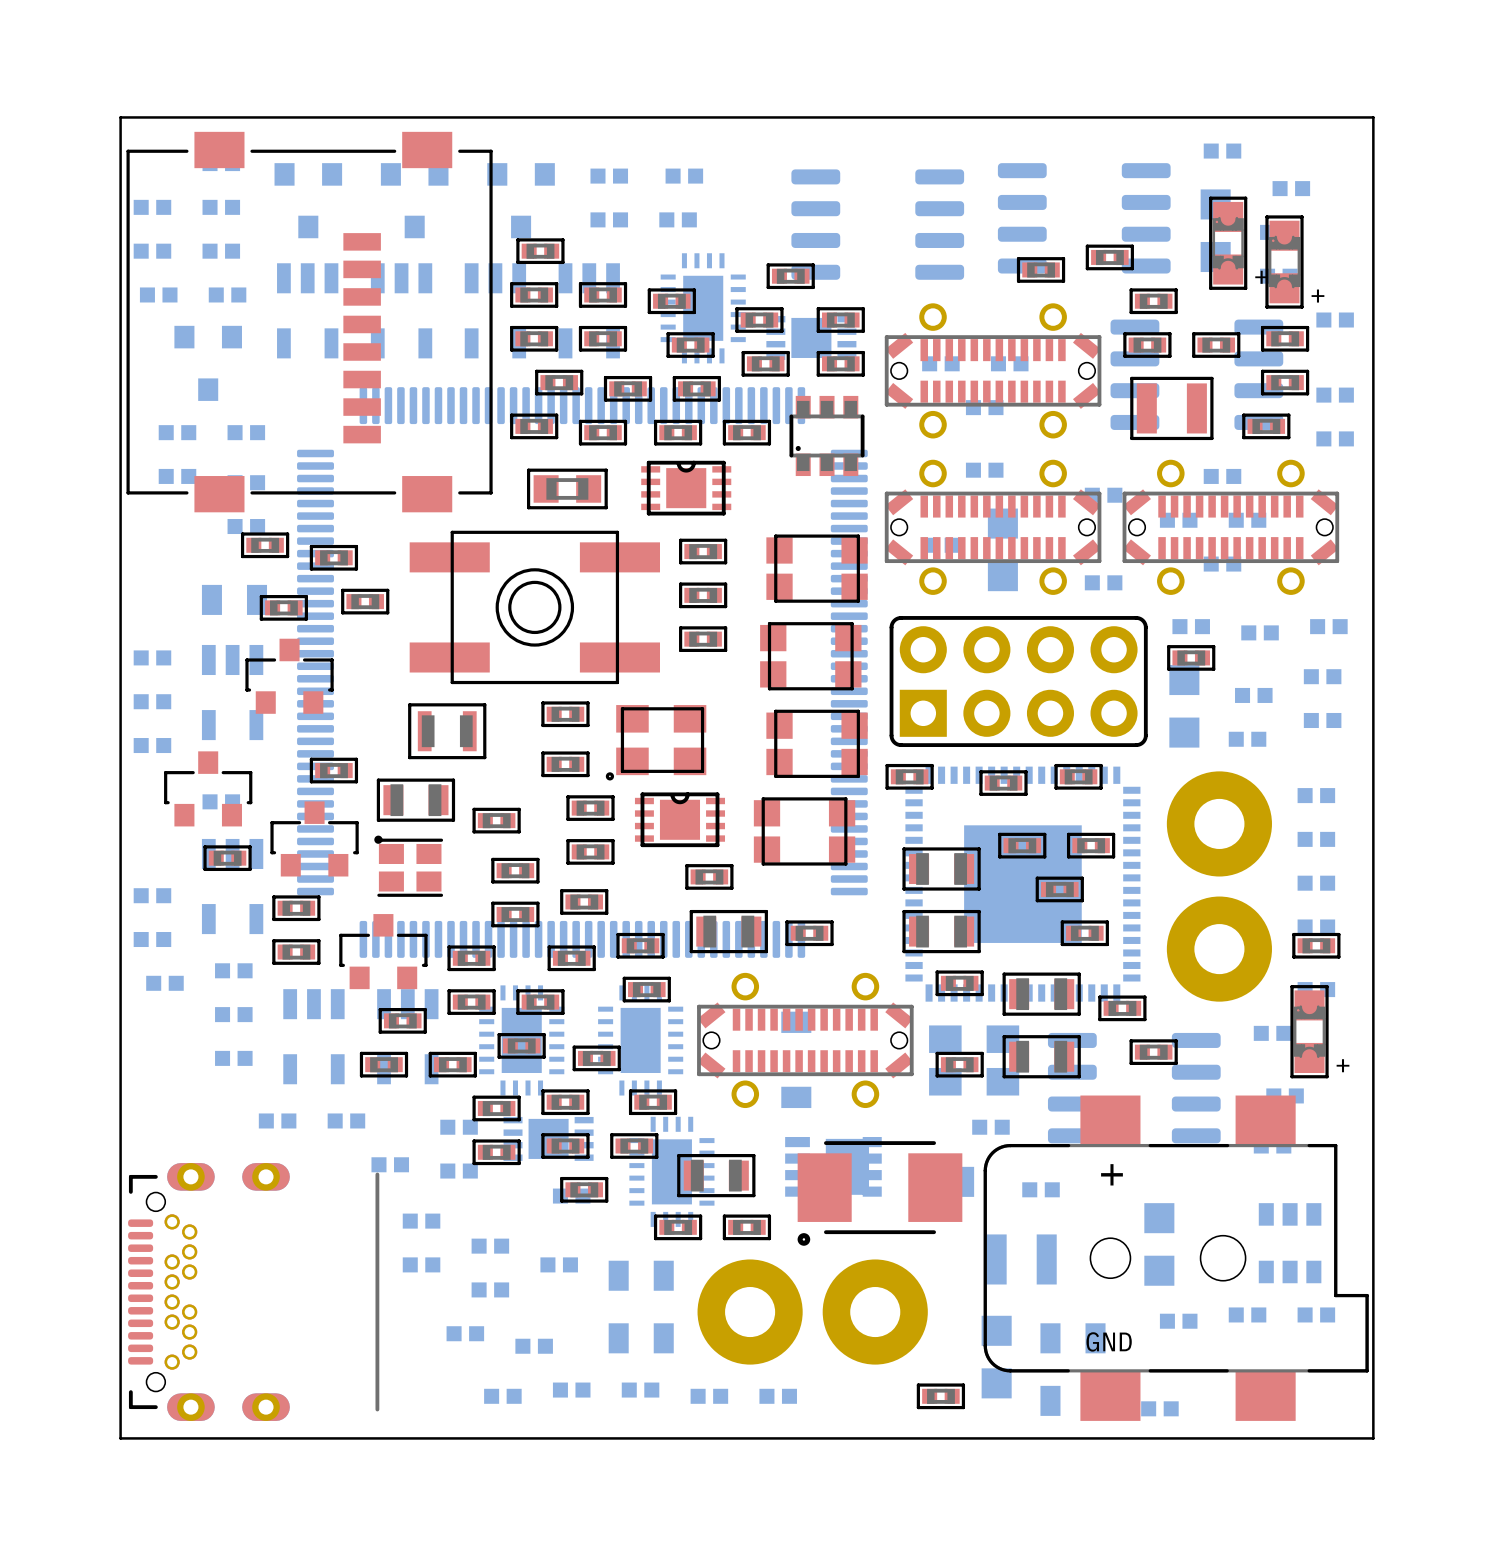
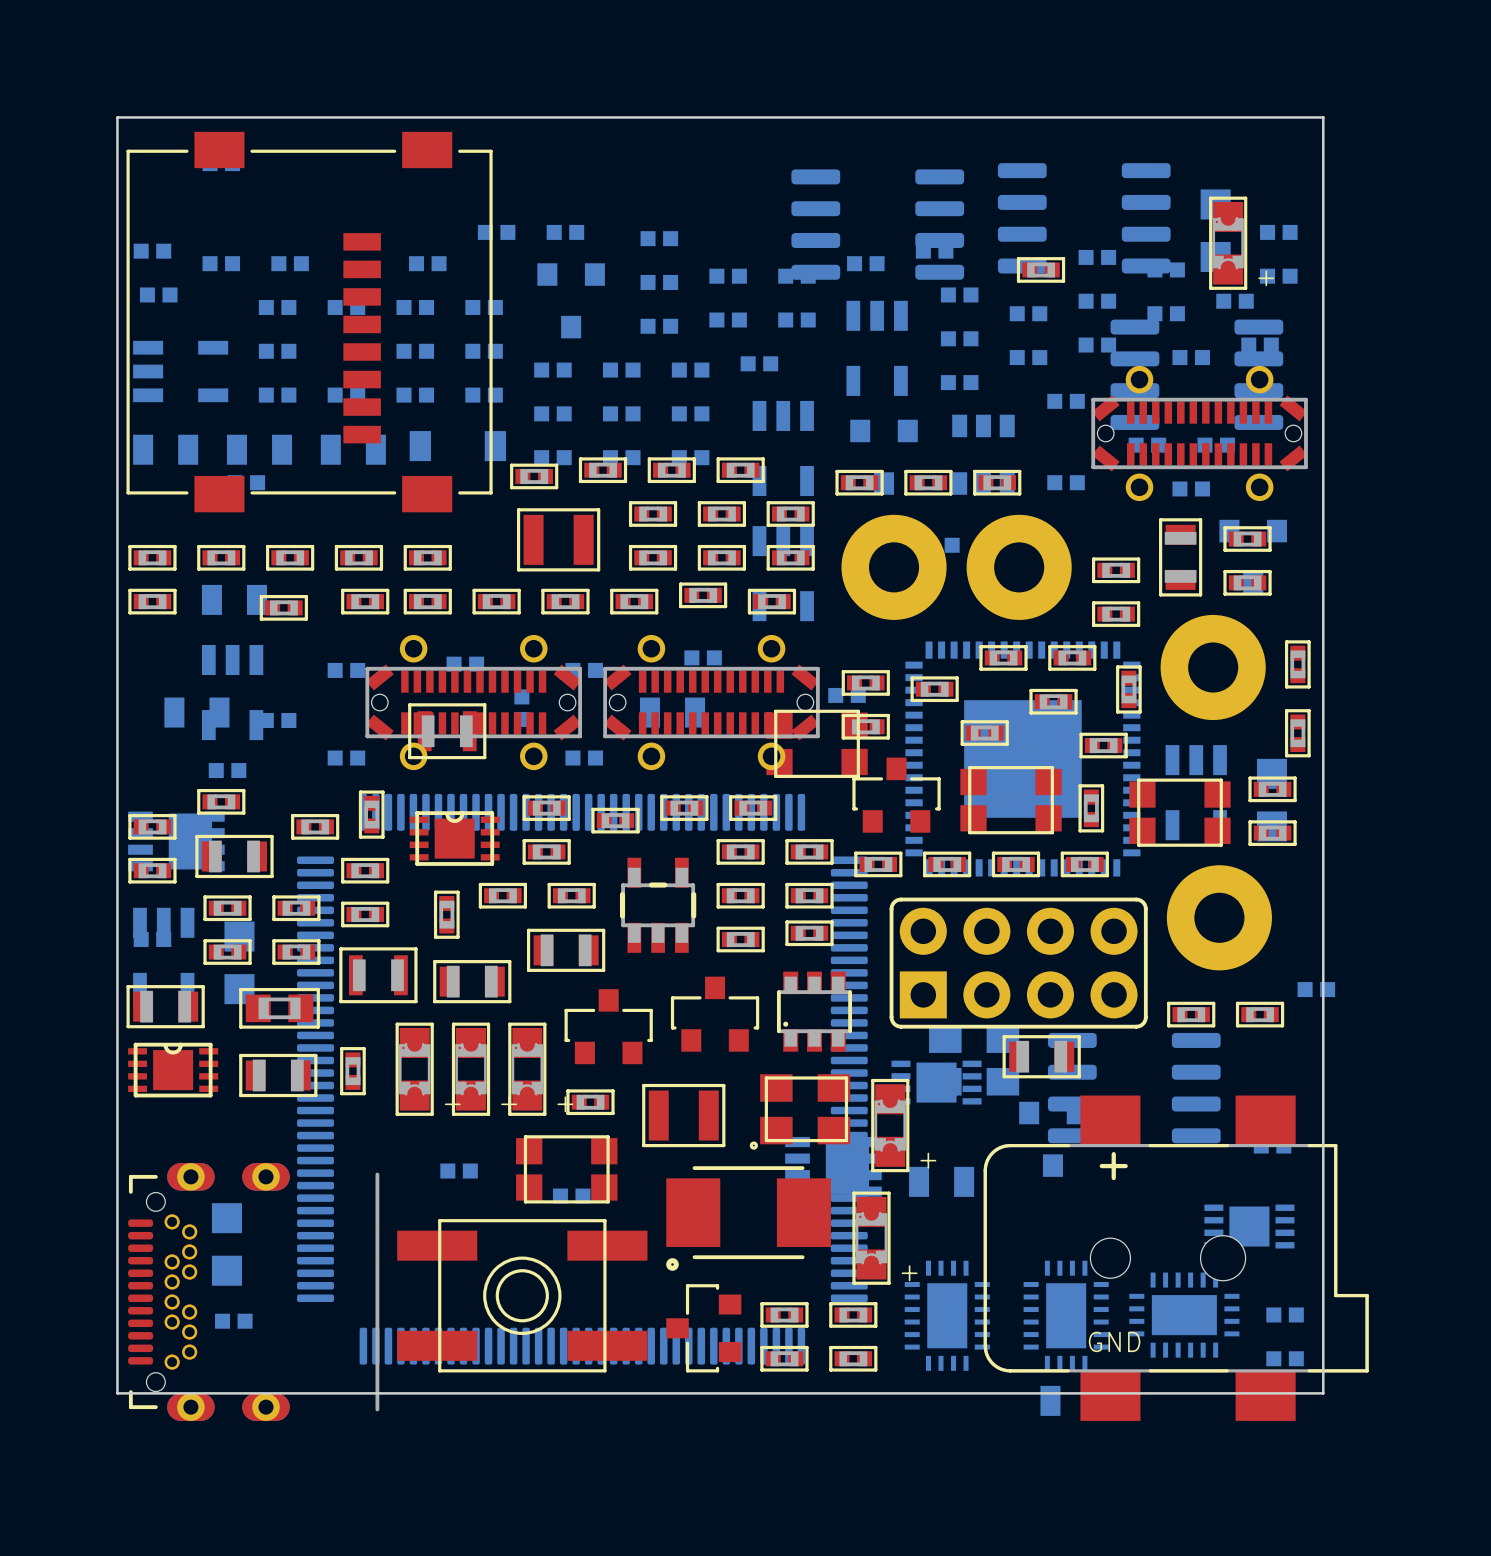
board edge: (120, 117) (120, 1438) (1373, 1438) (1373, 117) (1323, 117) -> (120, 117) (117, 117) (117, 1393) (1323, 1393) (1323, 117)
part: (1222, 151) -> none
part: (609, 176) -> none
part: (684, 176) -> none
part: (1291, 188) -> none
part: (308, 200) -> none
part: (414, 200) -> none
part: (521, 200) -> none
part: (152, 207) -> none
part: (221, 207) -> none
part: (609, 219) -> none
part: (678, 219) -> none
part: none -> (496, 232)
part: none -> (565, 232)
part: none -> (659, 238)
part position: (221, 251) -> (221, 263)
part: (540, 251) -> none
part: none -> (934, 251)
part side: top (1109, 257) -> bottom (1097, 257)
part: (1284, 262) -> none
part: none -> (290, 263)
part footprint: [370, 263, 433, 359] -> [396, 299, 435, 316]
part: none -> (427, 263)
part footprint: [464, 263, 527, 359] -> [465, 299, 503, 316]
part: none -> (865, 263)
part: none -> (1166, 269)
part: none -> (728, 276)
part side: top (790, 276) -> bottom (796, 276)
part: none -> (659, 282)
part: (227, 294) -> none
part: (534, 294) -> none
part: (603, 294) -> none
part: none -> (959, 294)
part: none -> (571, 300)
part: (671, 301) -> none
part: none -> (1097, 301)
part: (1153, 301) -> none
part: none -> (1235, 301)
part: none -> (277, 307)
part: none -> (346, 307)
part: (703, 308) -> none
part rotation: 0° (307, 310) -> 90° counterclockwise (180, 371)
part position: (307, 310) -> (180, 371)
part: (589, 310) -> none
part: none -> (1028, 313)
part: none -> (1166, 313)
part: none -> (728, 320)
part: (759, 320) -> none
part: none -> (796, 320)
part: (840, 320) -> none
part: (1335, 320) -> none
part: none -> (659, 326)
part: (811, 337) -> none
part: (534, 338) -> none
part: (603, 338) -> none
part: none -> (959, 338)
part: (1285, 338) -> none
part: (690, 345) -> none
part: none -> (1097, 345)
part: (1147, 345) -> none
part: (1216, 345) -> none
part: none -> (1260, 345)
part: none -> (877, 348)
part: none -> (277, 351)
part: none -> (415, 351)
part: none -> (484, 351)
part: none -> (1191, 357)
part: (208, 363) -> none
part side: top (765, 363) -> bottom (759, 363)
part: (840, 363) -> none
part: (940, 363) -> none
part position: (1009, 363) -> (1028, 357)
part: none -> (621, 370)
part: none -> (690, 370)
part: (993, 370) -> none
part side: top (559, 382) -> bottom (552, 370)
part: none -> (959, 382)
part: (1285, 382) -> none
part footprint: [297, 387, 868, 958] -> [565, 662, 604, 678]
part: (628, 388) -> none
part: (696, 388) -> none
part: none -> (277, 395)
part: none -> (346, 395)
part: none -> (415, 395)
part: none -> (484, 395)
part: (1335, 395) -> none
part: none -> (1066, 401)
part: (984, 407) -> none
part: (1171, 408) -> none
part: none -> (552, 413)
part: none -> (621, 413)
part: none -> (690, 413)
part footprint: [227, 425, 266, 441] -> [226, 434, 293, 465]
part: (534, 426) -> none
part: (1266, 426) -> none
part: (177, 432) -> none
part position: (603, 432) -> (603, 470)
part: (678, 432) -> none
part: (746, 432) -> none
part position: (827, 435) -> (814, 1011)
part: (1335, 438) -> none
part: none -> (1147, 445)
part: none -> (1216, 445)
part: none -> (457, 446)
part: none -> (783, 448)
part: none -> (165, 449)
part: none -> (353, 449)
part: none -> (983, 454)
part: none -> (552, 457)
part: none -> (621, 457)
part: none -> (690, 457)
part: none -> (884, 457)
part: none -> (671, 470)
part: none -> (740, 470)
part: (984, 470) -> none
part: (177, 476) -> none
part: none -> (534, 476)
part: (1222, 476) -> none
part: none -> (859, 482)
part: none -> (928, 482)
part: none -> (997, 482)
part: none -> (1066, 482)
part position: (567, 488) -> (279, 1008)
part: (686, 488) -> none
part: none -> (1191, 488)
part: (1103, 495) -> none
part: none -> (653, 513)
part: none -> (721, 513)
part: none -> (790, 513)
part: (1178, 520) -> none
part: (1247, 520) -> none
part: (246, 526) -> none
part: (993, 527) -> none
part position: (1230, 527) -> (1199, 433)
part: none -> (558, 539)
part: none -> (1247, 539)
part: (265, 545) -> none
part: (1002, 549) -> none
part position: (703, 551) -> (721, 557)
part: none -> (152, 557)
part: none -> (221, 557)
part: none -> (290, 557)
part: (333, 557) -> none
part: none -> (358, 557)
part: none -> (427, 557)
part: none -> (653, 557)
part: none -> (790, 557)
part: none -> (1180, 557)
part: none -> (1253, 557)
part: (1222, 564) -> none
part: none -> (894, 567)
part: none -> (1019, 567)
part: (817, 568) -> none
part: none -> (1116, 570)
part: none -> (783, 573)
part: (1103, 582) -> none
part: none -> (1247, 582)
part: none -> (152, 601)
part: none -> (427, 601)
part: none -> (496, 601)
part: none -> (565, 601)
part: none -> (634, 601)
part: none -> (771, 601)
part: (534, 607) -> none
part: none -> (1116, 614)
part: (1191, 626) -> none
part: (1328, 626) -> none
part: (1260, 632) -> none
part side: top (703, 639) -> bottom (703, 657)
part: (810, 656) -> none
part: (152, 657) -> none
part: none -> (1003, 657)
part: none -> (1072, 657)
part: (1191, 657) -> none
part: none -> (465, 664)
part: none -> (1297, 664)
part: none -> (1213, 667)
part: none -> (346, 670)
part: (289, 676) -> none
part: (1322, 676) -> none
part position: (1018, 681) -> (1018, 963)
part: none -> (865, 682)
part: none -> (934, 689)
part: none -> (1128, 689)
part: none -> (847, 695)
part: (1253, 695) -> none
part: (152, 701) -> none
part: none -> (1053, 701)
part: none -> (473, 702)
part: none -> (711, 702)
part position: (1184, 706) -> (1271, 800)
part: none -> (521, 708)
part: none -> (196, 712)
part: none -> (672, 712)
part: (565, 714) -> none
part: none -> (277, 720)
part: (1322, 720) -> none
part: none -> (865, 726)
part: none -> (984, 733)
part: none -> (1297, 733)
part: (1247, 739) -> none
part position: (656, 742) -> (799, 1111)
part: (152, 745) -> none
part: none -> (1103, 745)
part footprint: [885, 763, 934, 790] -> [852, 757, 941, 833]
part side: top (565, 764) -> bottom (584, 758)
part: none -> (227, 770)
part side: top (333, 770) -> bottom (346, 758)
part: (1078, 776) -> none
part: (1003, 783) -> none
part: (208, 788) -> none
part: none -> (1272, 789)
part footprint: [634, 792, 726, 848] -> [660, 795, 709, 821]
part: none -> (1196, 792)
part: (1316, 795) -> none
part footprint: [753, 797, 856, 866] -> [785, 839, 834, 865]
part: (415, 800) -> none
part: none -> (1011, 800)
part side: bottom (221, 801) -> top (221, 801)
part footprint: [270, 801, 359, 877] -> [291, 814, 340, 840]
part: none -> (546, 808)
part: (590, 808) -> none
part: none -> (753, 808)
part: none -> (1091, 808)
part: none -> (1179, 812)
part: none -> (371, 814)
part: (496, 820) -> none
part: none -> (615, 820)
part: (1219, 823) -> none
part: none -> (152, 826)
part: none -> (1272, 833)
part: none -> (454, 838)
part: (1316, 839) -> none
part: none -> (176, 841)
part footprint: [203, 845, 252, 872] -> [195, 834, 274, 879]
part position: (1022, 845) -> (1016, 864)
part: (1091, 845) -> none
part footprint: [902, 847, 981, 891] -> [923, 851, 972, 878]
part: none -> (546, 851)
part: (590, 851) -> none
part: none -> (740, 851)
part: none -> (1084, 864)
part: (408, 866) -> none
part: none -> (365, 870)
part: (515, 870) -> none
part: (709, 876) -> none
part: (1316, 883) -> none
part position: (1022, 884) -> (1022, 758)
part position: (232, 886) -> (163, 955)
part: (1059, 889) -> none
part side: bottom (152, 895) -> top (152, 870)
part: none -> (502, 895)
part: none -> (740, 895)
part: none -> (809, 895)
part position: (584, 901) -> (571, 895)
part: none -> (227, 908)
part footprint: [689, 909, 768, 954] -> [716, 926, 765, 953]
part: none -> (365, 914)
part: none -> (446, 914)
part: (515, 914) -> none
part: (1316, 926) -> none
part: (941, 931) -> none
part: (1084, 933) -> none
part footprint: [547, 945, 596, 972] -> [526, 928, 606, 972]
part: (640, 945) -> none
part: (1316, 945) -> none
part position: (1219, 949) -> (1219, 917)
part: (383, 951) -> none
part: none -> (227, 952)
part: (471, 958) -> none
part: none -> (239, 962)
part: (233, 970) -> none
part: none -> (378, 975)
part: none -> (472, 981)
part: (164, 983) -> none
part: (959, 983) -> none
part: (646, 989) -> none
part: (1041, 994) -> none
part: (471, 1002) -> none
part: (540, 1002) -> none
part: none -> (165, 1006)
part: (1122, 1008) -> none
part: (233, 1014) -> none
part: none -> (715, 1014)
part: none -> (1191, 1014)
part: (402, 1020) -> none
part: none -> (608, 1026)
part: (1309, 1031) -> none
part side: bottom (1272, 1033) -> top (1260, 1014)
part side: bottom (313, 1036) -> top (658, 905)
part: (407, 1036) -> none
part: (521, 1040) -> none
part: (640, 1040) -> none
part: (805, 1040) -> none
part: (521, 1045) -> none
part footprint: [428, 1051, 477, 1078] -> [451, 1022, 491, 1116]
part: (1153, 1052) -> none
part: (233, 1058) -> none
part: (596, 1058) -> none
part: (796, 1059) -> none
part rotation: 0° (383, 1064) -> 90° clockwise (352, 1071)
part position: (383, 1064) -> (352, 1071)
part: (959, 1064) -> none
part: none -> (414, 1069)
part: none -> (527, 1069)
part: none -> (173, 1070)
part: none -> (278, 1075)
part: none -> (582, 1079)
part: none -> (936, 1082)
part: (1285, 1095) -> none
part: (565, 1102) -> none
part: none -> (590, 1102)
part: (653, 1102) -> none
part: (496, 1108) -> none
part: none -> (683, 1115)
part: (277, 1120) -> none
part: (346, 1120) -> none
part: none -> (890, 1125)
part: (459, 1127) -> none
part: (990, 1127) -> none
part: (548, 1138) -> none
part: none -> (1052, 1139)
part: (565, 1146) -> none
part: (634, 1146) -> none
part: (496, 1152) -> none
part: (390, 1164) -> none
part: none -> (566, 1169)
part: (671, 1171) -> none
part: (716, 1175) -> none
part: (584, 1189) -> none
part: (1041, 1189) -> none
part: (879, 1193) -> none
part footprint: [722, 1214, 772, 1241] -> [666, 1166, 831, 1271]
part: (421, 1221) -> none
part: none -> (1249, 1226)
part: (678, 1227) -> none
part: none -> (871, 1238)
part: (1290, 1243) -> none
part: none -> (226, 1244)
part: (1159, 1244) -> none
part: (490, 1246) -> none
part footprint: [822, 1259, 928, 1365] -> [829, 1302, 878, 1328]
part: (1021, 1259) -> none
part: (421, 1264) -> none
part: (559, 1264) -> none
part: (641, 1275) -> none
part: (490, 1289) -> none
part: none -> (522, 1295)
part: (750, 1312) -> none
part footprint: [1159, 1313, 1198, 1329] -> [1129, 1272, 1240, 1358]
part: none -> (784, 1314)
part: (1247, 1314) -> none
part: none -> (1285, 1314)
part: (1316, 1314) -> none
part: none -> (947, 1315)
part: none -> (233, 1321)
part footprint: [1040, 1323, 1106, 1354] -> [1023, 1260, 1109, 1371]
part: none -> (703, 1328)
part: (465, 1333) -> none
part: (641, 1338) -> none
part: (534, 1346) -> none
part: (996, 1357) -> none
part: none -> (784, 1358)
part: none -> (853, 1358)
part: none -> (1285, 1358)
part: (571, 1390) -> none
part: (640, 1390) -> none
part: (502, 1396) -> none
part: (709, 1396) -> none
part: (778, 1396) -> none
part: (940, 1396) -> none
part side: bottom (1159, 1408) -> top (878, 864)

